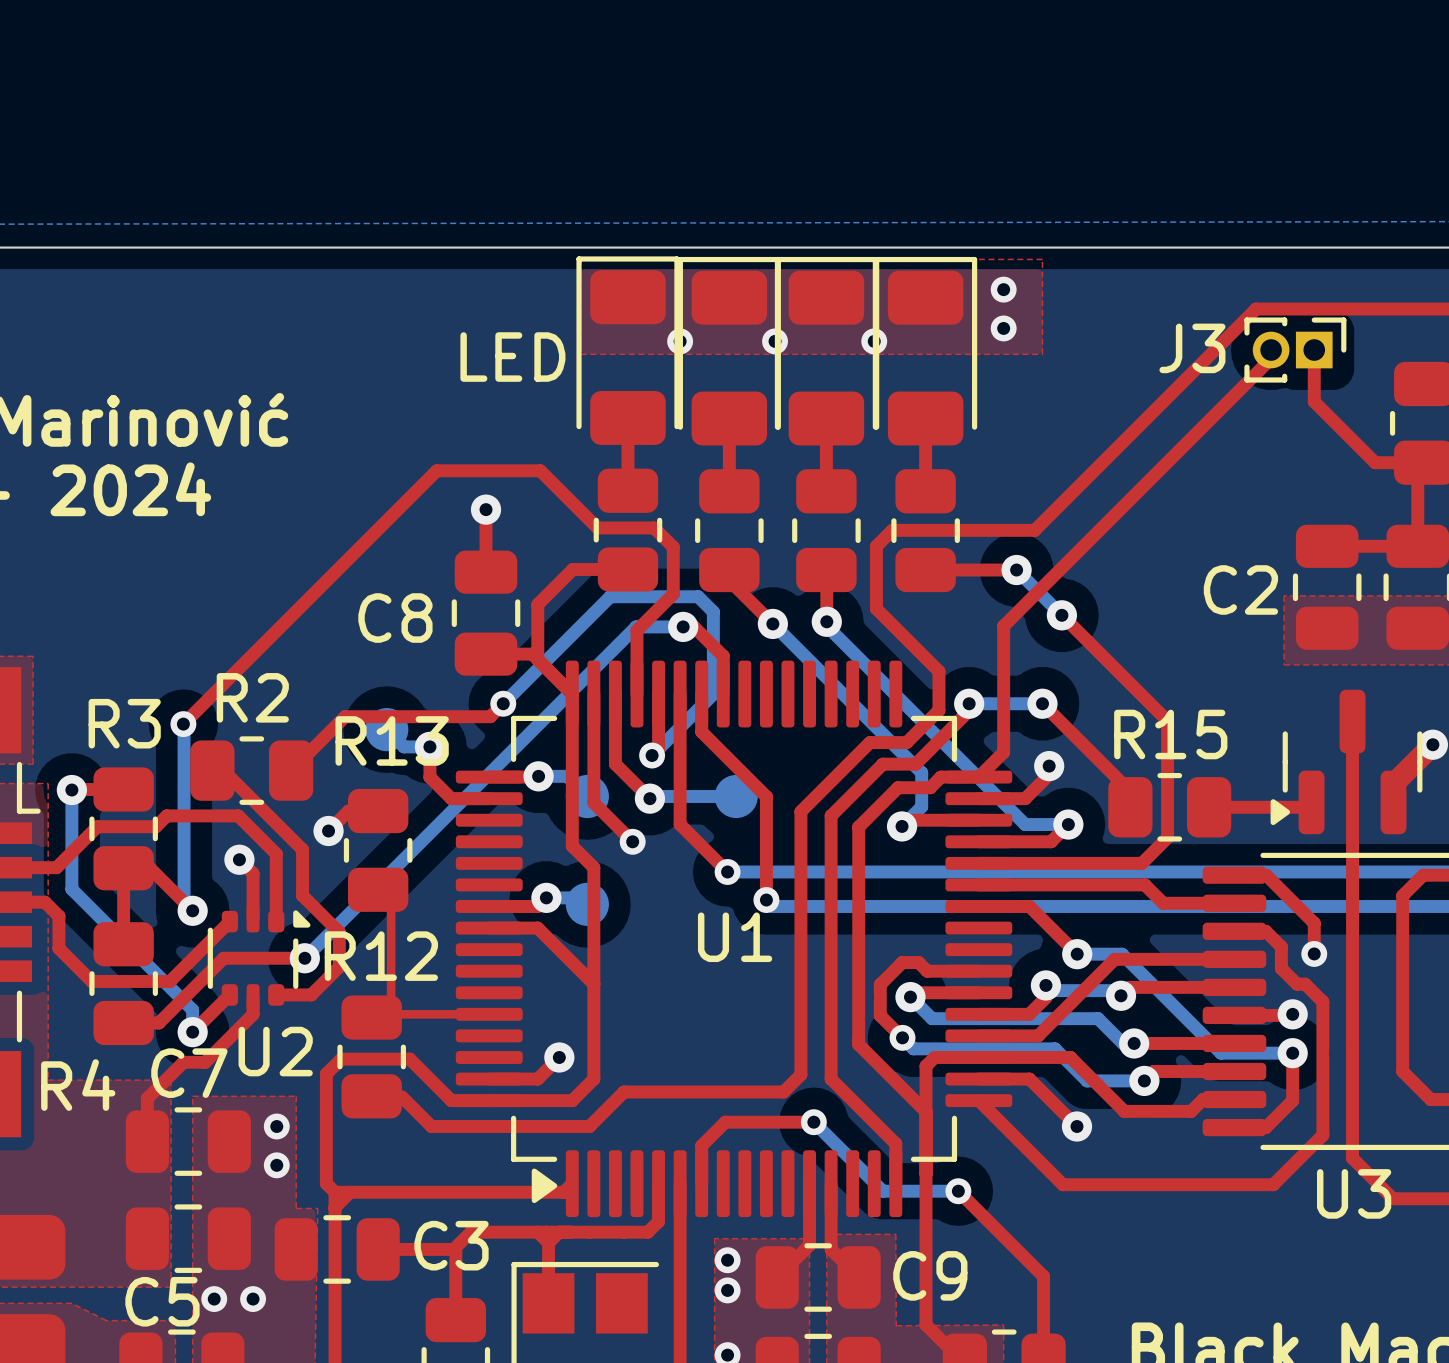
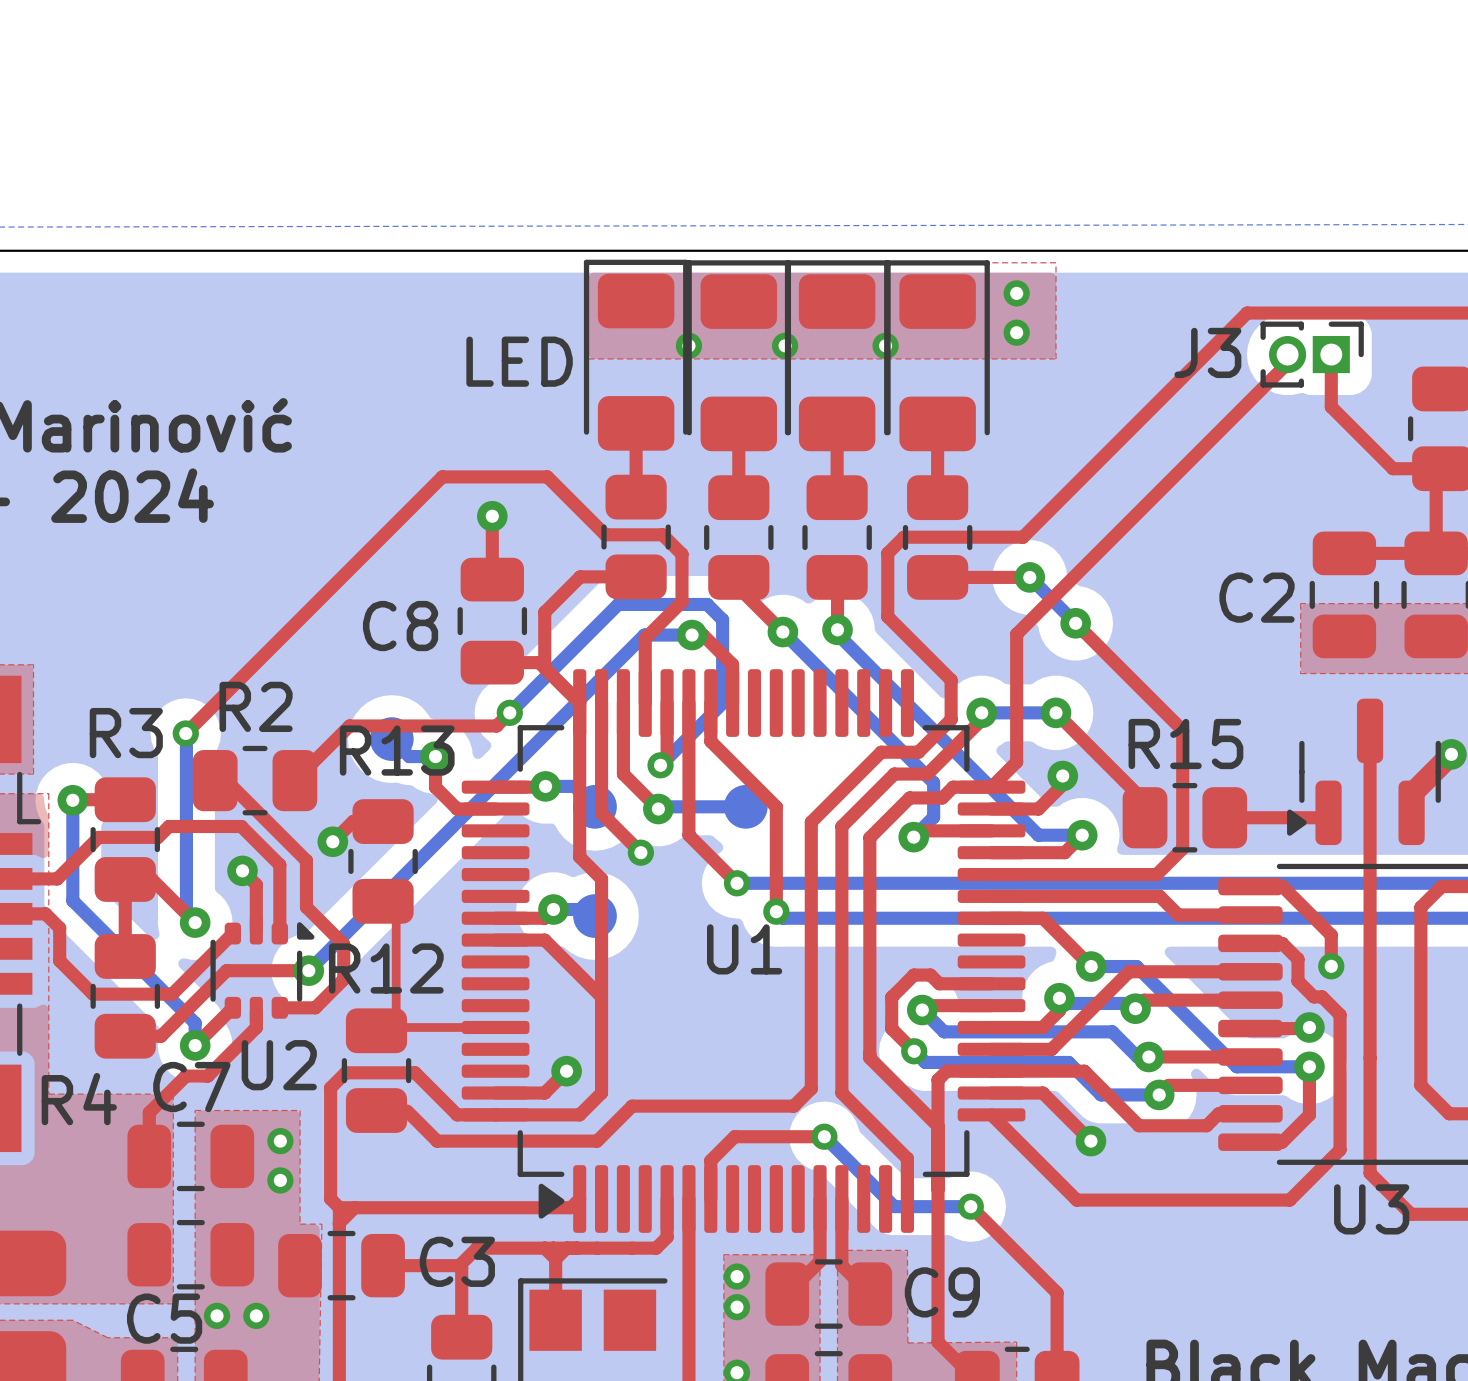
top track: (1256, 309) (1034, 530) (1009, 530) -> (1272, 313) (1247, 313) (1023, 537)

